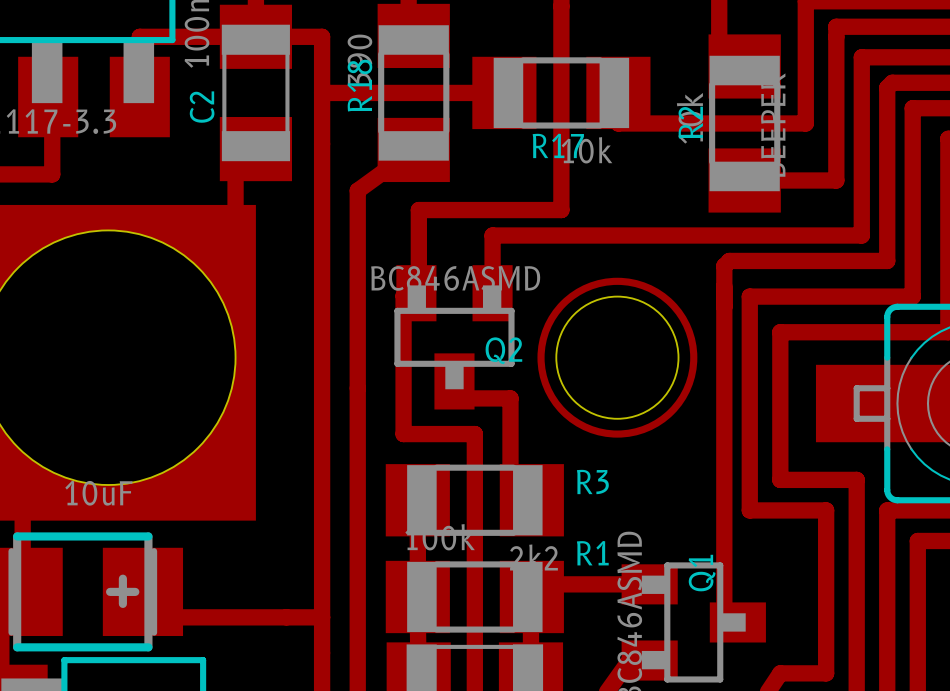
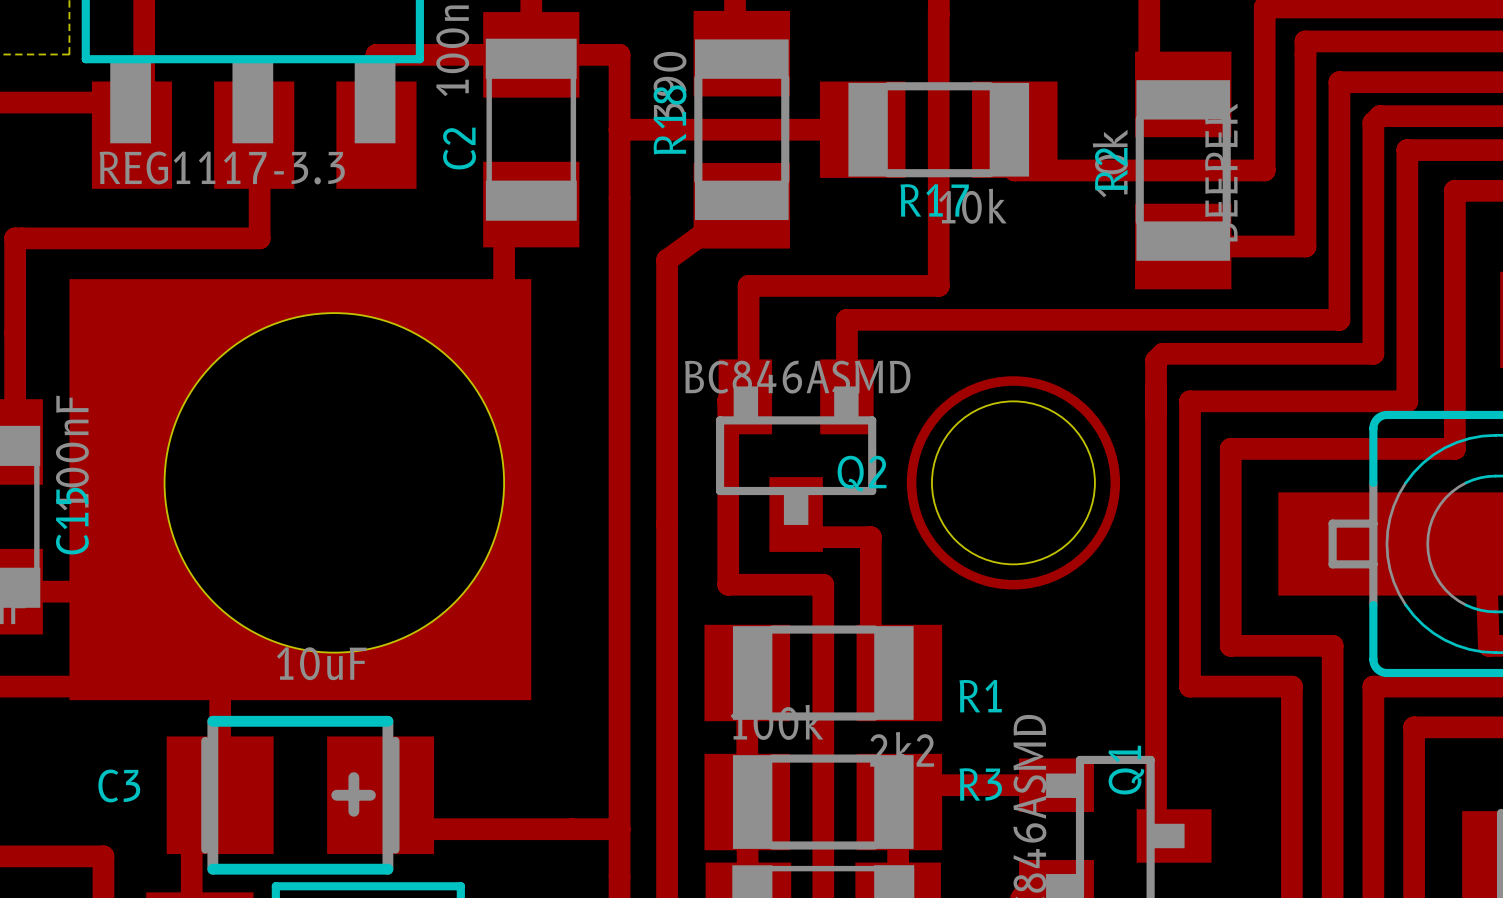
R3 name position: R3 (592, 481) -> R3 (980, 784)
R1 name position: R1 (592, 553) -> R1 (980, 696)

